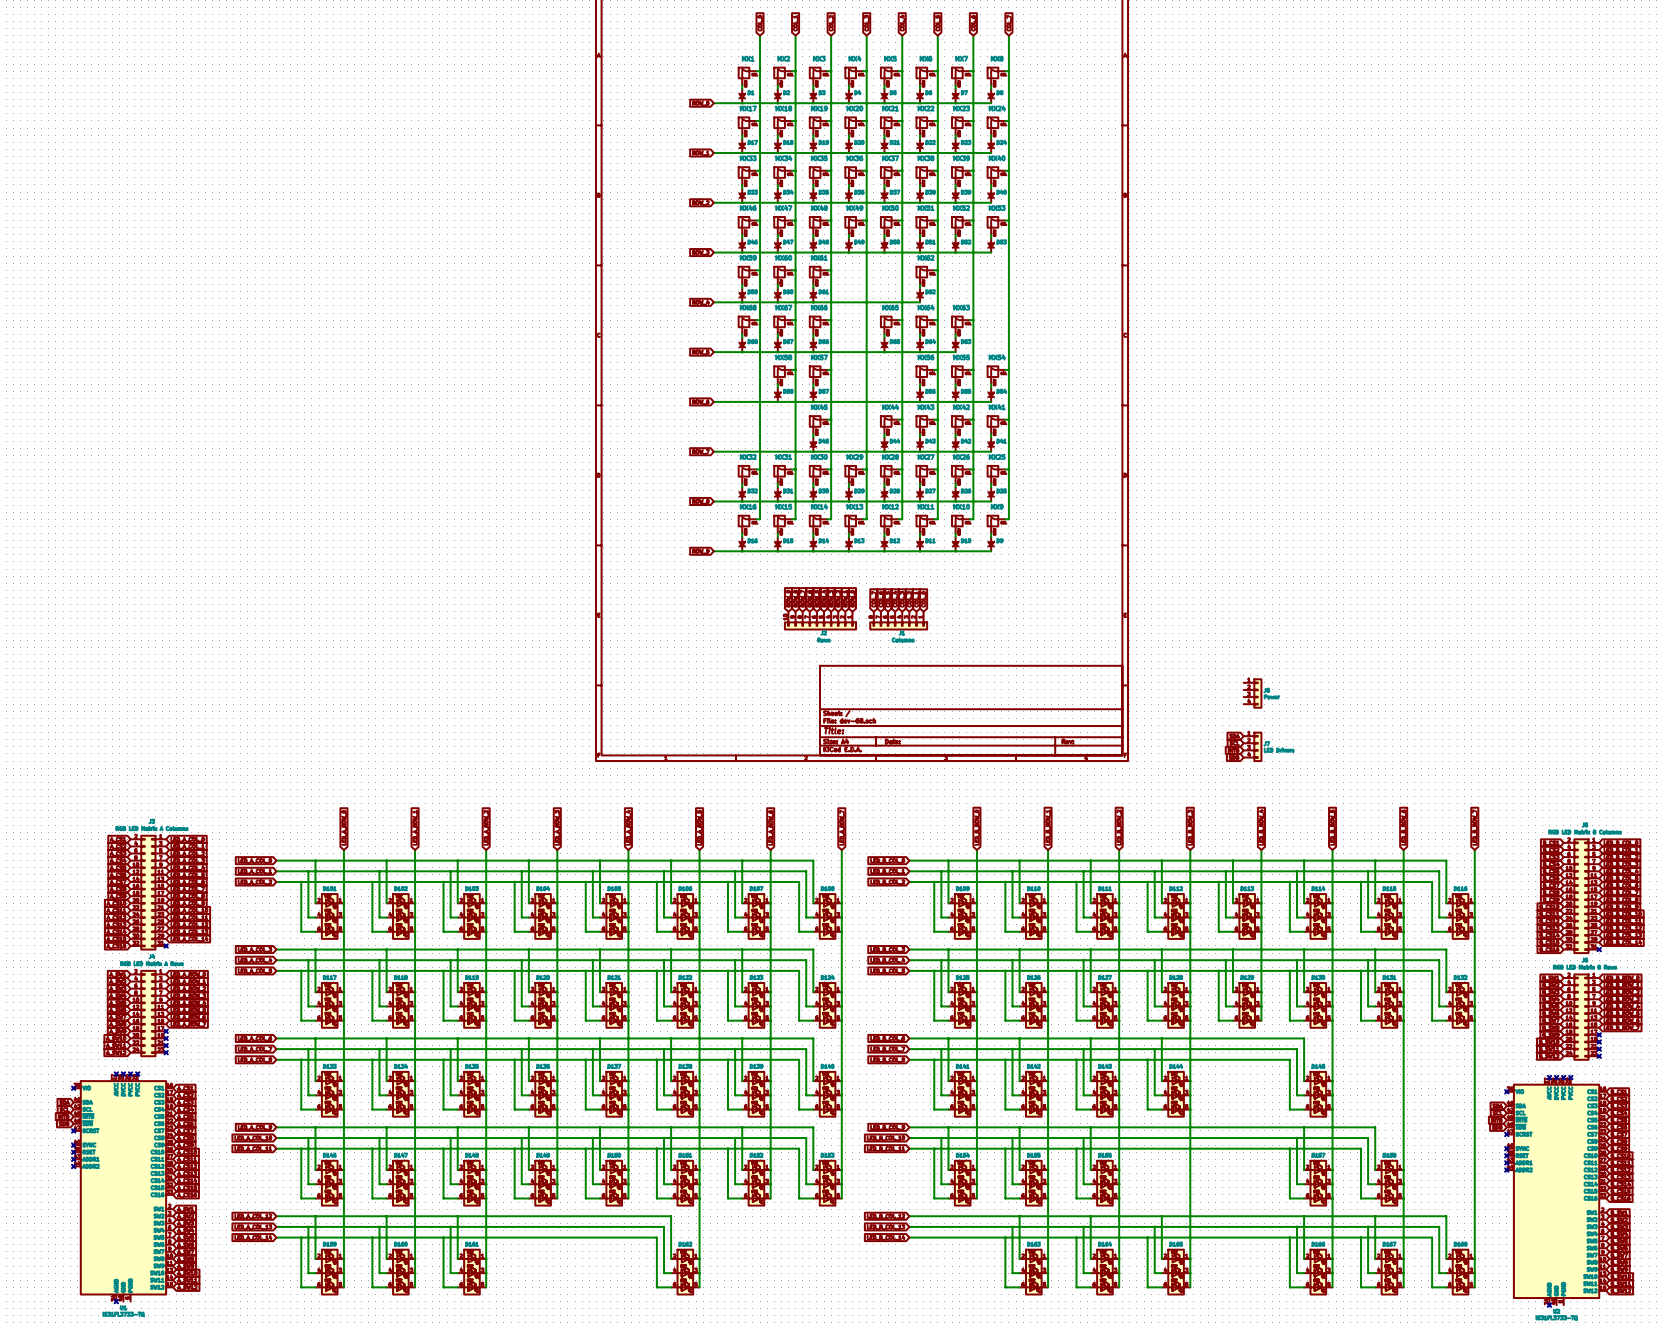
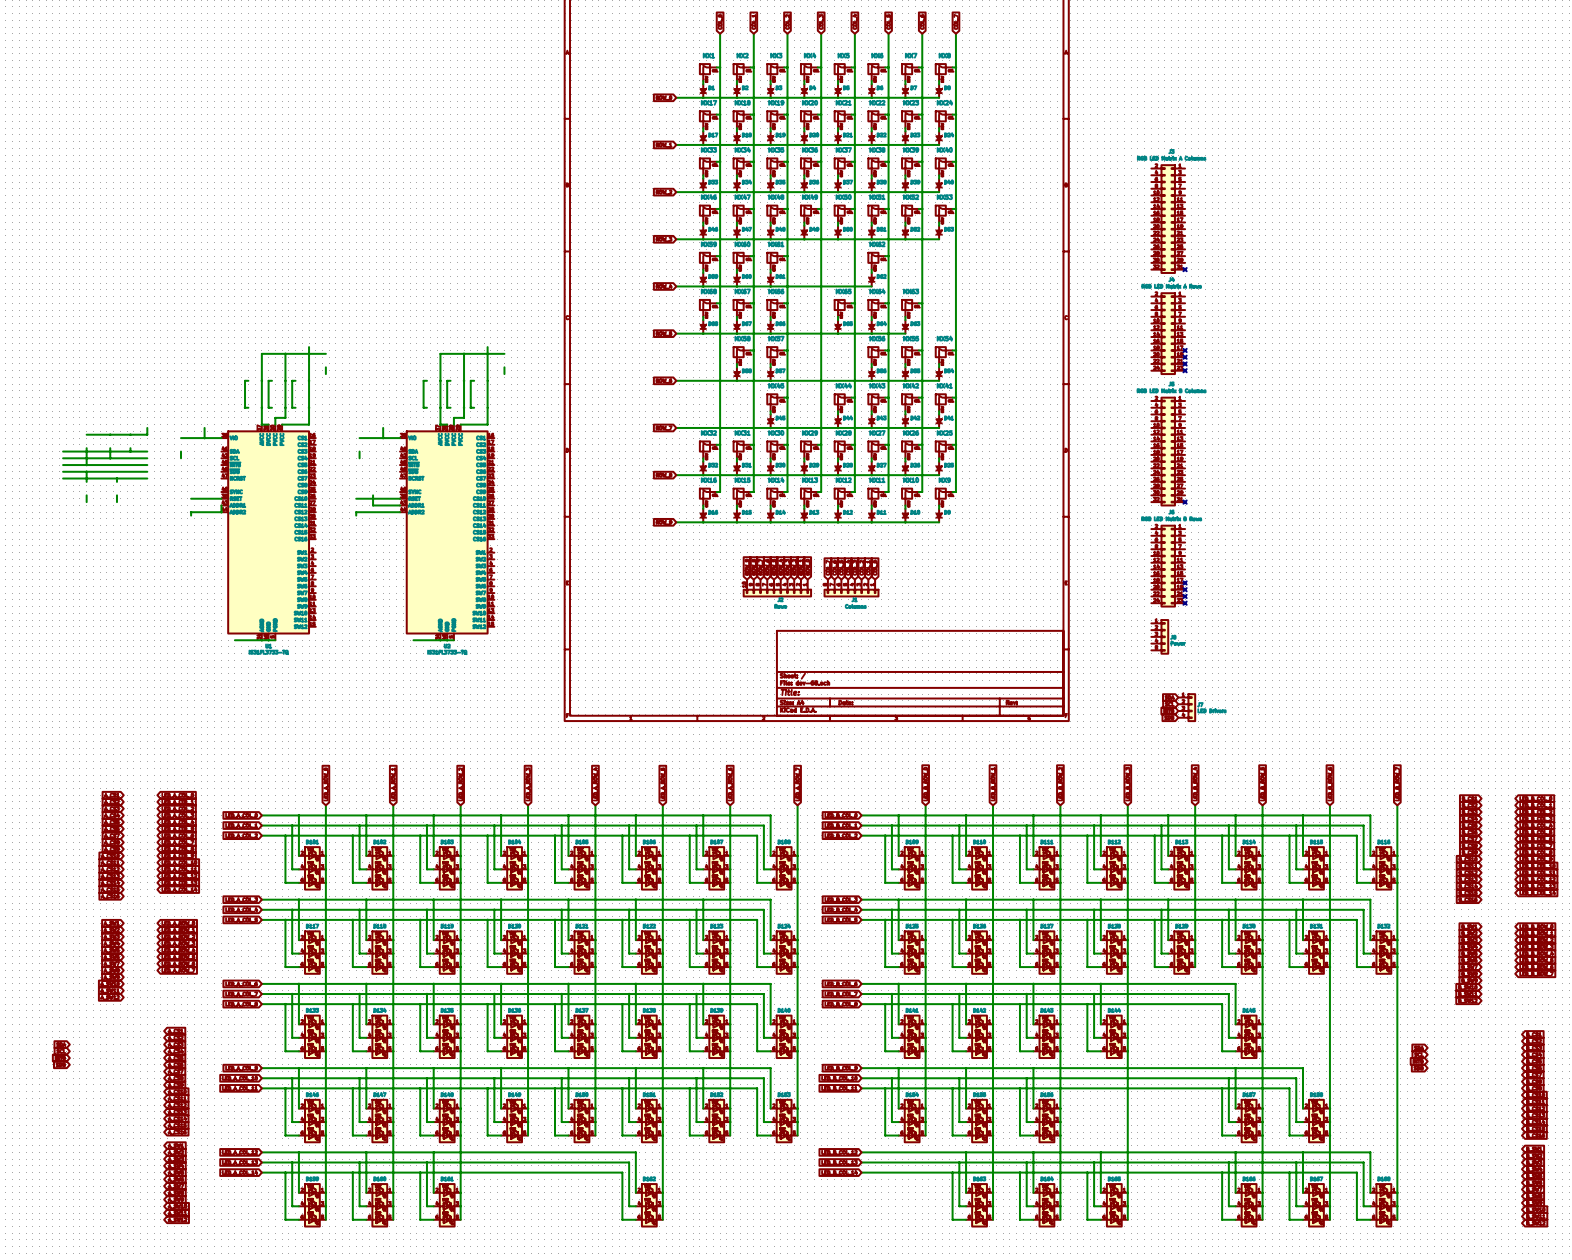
no-connect mark: none -> (1185, 269)
wire: none -> (309, 347) (309, 424) (282, 424)
wire: none -> (487, 347) (487, 424) (460, 424)
no-connect mark: none -> (1185, 350)
wire: none -> (285, 353) (285, 417) (275, 417) (275, 424)
wire: none -> (325, 353) (261, 353) (261, 424) (268, 424)
wire: none -> (464, 353) (464, 417) (453, 417) (453, 424)
wire: none -> (504, 353) (440, 353) (440, 424) (447, 424)
no-connect mark: none -> (1185, 357)
no-connect mark: none -> (1185, 363)
wire: none -> (325, 367) (325, 374)
wire: none -> (504, 367) (504, 374)
no-connect mark: none -> (1185, 370)
wire: none -> (248, 380) (245, 380) (245, 407) (248, 407)
wire: none -> (271, 380) (268, 380) (268, 407) (271, 407)
wire: none -> (295, 380) (292, 380) (292, 407) (295, 407)
wire: none -> (426, 380) (423, 380) (423, 407) (426, 407)
wire: none -> (450, 380) (447, 380) (447, 407) (450, 407)
wire: none -> (474, 380) (470, 380) (470, 407) (474, 407)
wire: none -> (147, 427) (147, 434) (86, 434)
wire: none -> (204, 427) (204, 438)
wire: none -> (383, 427) (383, 438)
wire: none -> (181, 438) (221, 438)
wire: none -> (359, 438) (400, 438)
wire: none -> (86, 448) (86, 465)
wire: none -> (110, 448) (110, 458)
wire: none -> (130, 448) (130, 451)
wire: none -> (63, 451) (147, 451)
wire: none -> (181, 451) (181, 458)
wire: none -> (359, 451) (359, 458)
wire: none -> (63, 458) (147, 458)
wire: none -> (63, 465) (147, 465)
wire: none -> (63, 471) (147, 471)
wire: none -> (86, 471) (86, 481)
wire: none -> (63, 478) (147, 478)
wire: none -> (116, 478) (116, 481)
wire: none -> (86, 495) (86, 502)
wire: none -> (116, 495) (116, 502)
wire: none -> (373, 495) (373, 505) (400, 505)
wire: none -> (191, 498) (221, 498)
wire: none -> (356, 498) (400, 498)
no-connect mark: none -> (1185, 502)
wire: none -> (221, 505) (221, 512) (191, 512) (191, 515)
wire: none -> (400, 512) (356, 512) (356, 515)
no-connect mark: none -> (1185, 582)
no-connect mark: none -> (1185, 589)
no-connect mark: none -> (1185, 596)
no-connect mark: none -> (1185, 603)
wire: none -> (234, 640) (275, 640)
wire: none -> (413, 640) (453, 640)
part symbol: [1243, 678, 1262, 709] -> [1151, 619, 1169, 655]
part position: (148, 892) -> (1168, 219)
part position: (1581, 896) -> (1168, 451)
no-connect mark: (166, 945) -> none
no-connect mark: (1599, 949) -> none
part position: (148, 1013) -> (1168, 333)
part position: (1581, 1017) -> (1168, 566)
no-connect mark: (166, 1031) -> none
no-connect mark: (1599, 1034) -> none
no-connect mark: (166, 1038) -> none
no-connect mark: (1599, 1042) -> none
no-connect mark: (166, 1045) -> none
no-connect mark: (1599, 1049) -> none
no-connect mark: (166, 1052) -> none
no-connect mark: (1599, 1056) -> none
no-connect mark: (116, 1074) -> none
no-connect mark: (123, 1074) -> none
no-connect mark: (130, 1074) -> none
no-connect mark: (137, 1074) -> none
no-connect mark: (1549, 1077) -> none
no-connect mark: (1556, 1077) -> none
no-connect mark: (1563, 1077) -> none
no-connect mark: (1570, 1077) -> none
no-connect mark: (73, 1088) -> none
no-connect mark: (1506, 1091) -> none
no-connect mark: (73, 1130) -> none
no-connect mark: (1506, 1134) -> none
no-connect mark: (73, 1145) -> none
no-connect mark: (1506, 1148) -> none
no-connect mark: (73, 1152) -> none
no-connect mark: (1506, 1155) -> none
no-connect mark: (73, 1159) -> none
no-connect mark: (1506, 1162) -> none
no-connect mark: (73, 1166) -> none
no-connect mark: (1506, 1170) -> none
part position: (123, 1187) -> (268, 532)
part position: (1556, 1191) -> (447, 532)
no-connect mark: (116, 1301) -> none
no-connect mark: (1549, 1305) -> none

